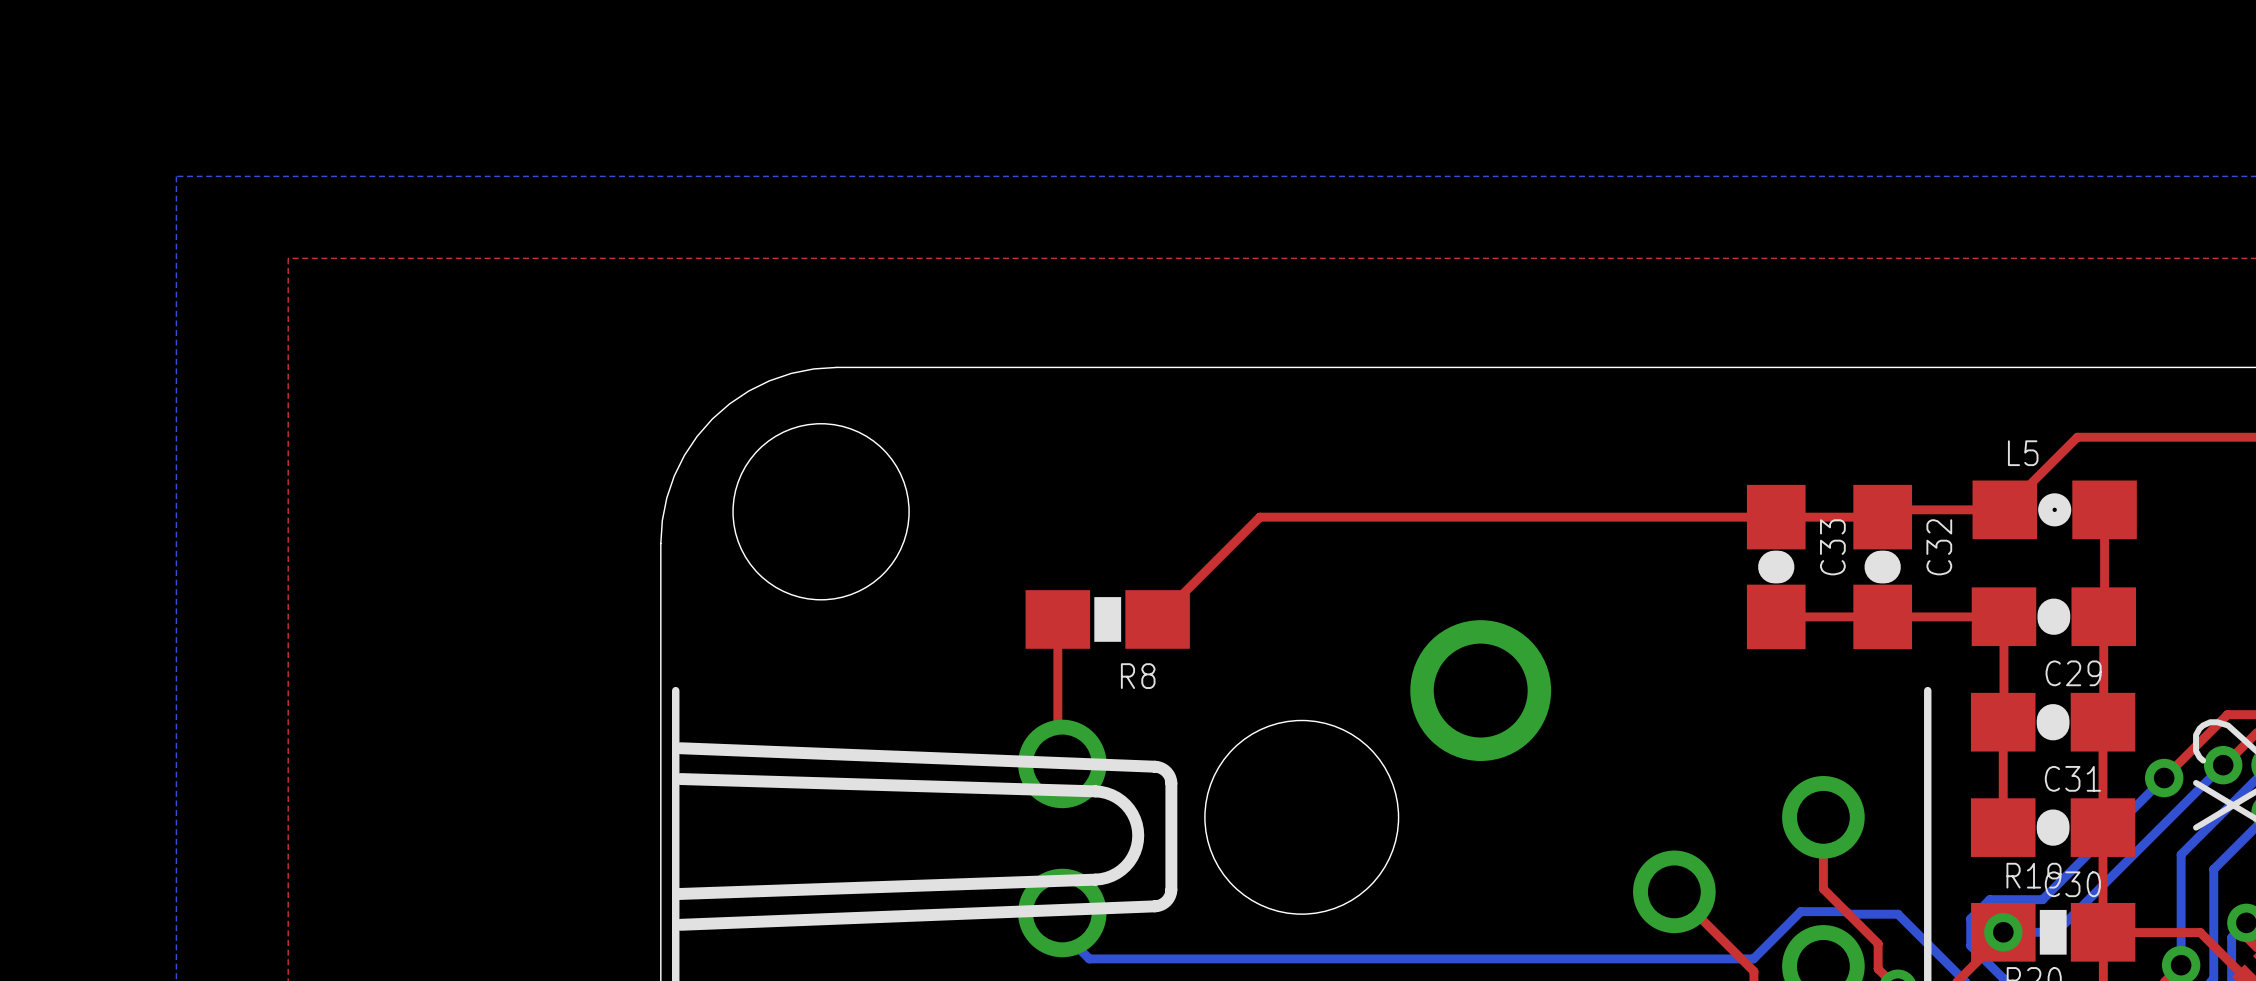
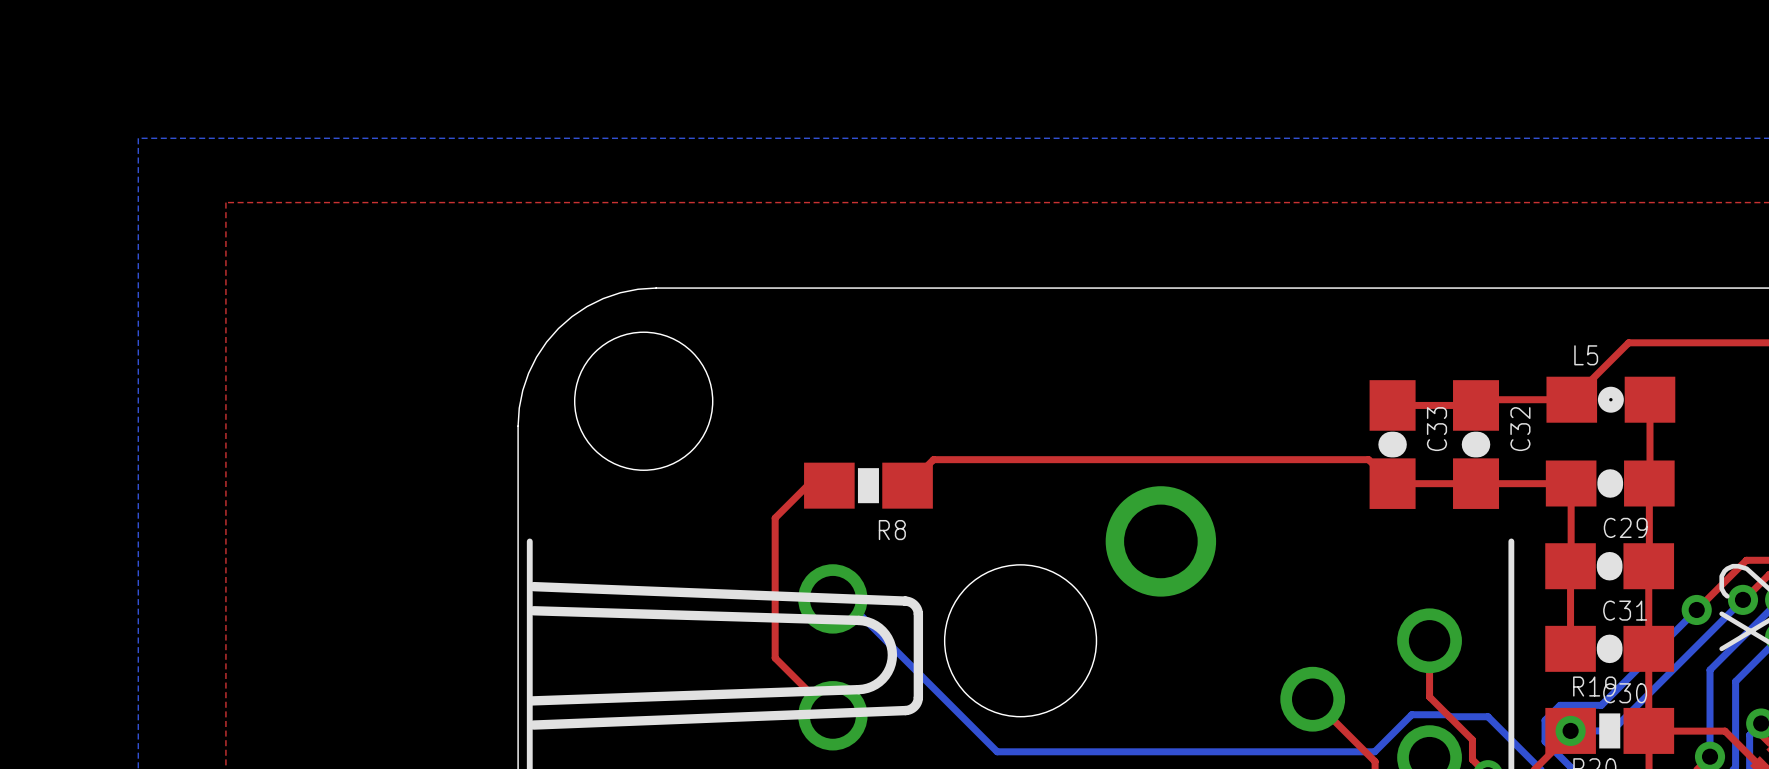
top track: (1776, 517) (1259, 517) (1190, 586) -> (1392, 483) (1368, 459) (933, 459)
top track: (1057, 619) (1057, 759) (1062, 763) -> (829, 485) (807, 485) (775, 518) (775, 658) (832, 715)
bottom track: (1062, 912) (1062, 931) (1089, 958) (1271, 958) -> (832, 598) (844, 598) (997, 751)

